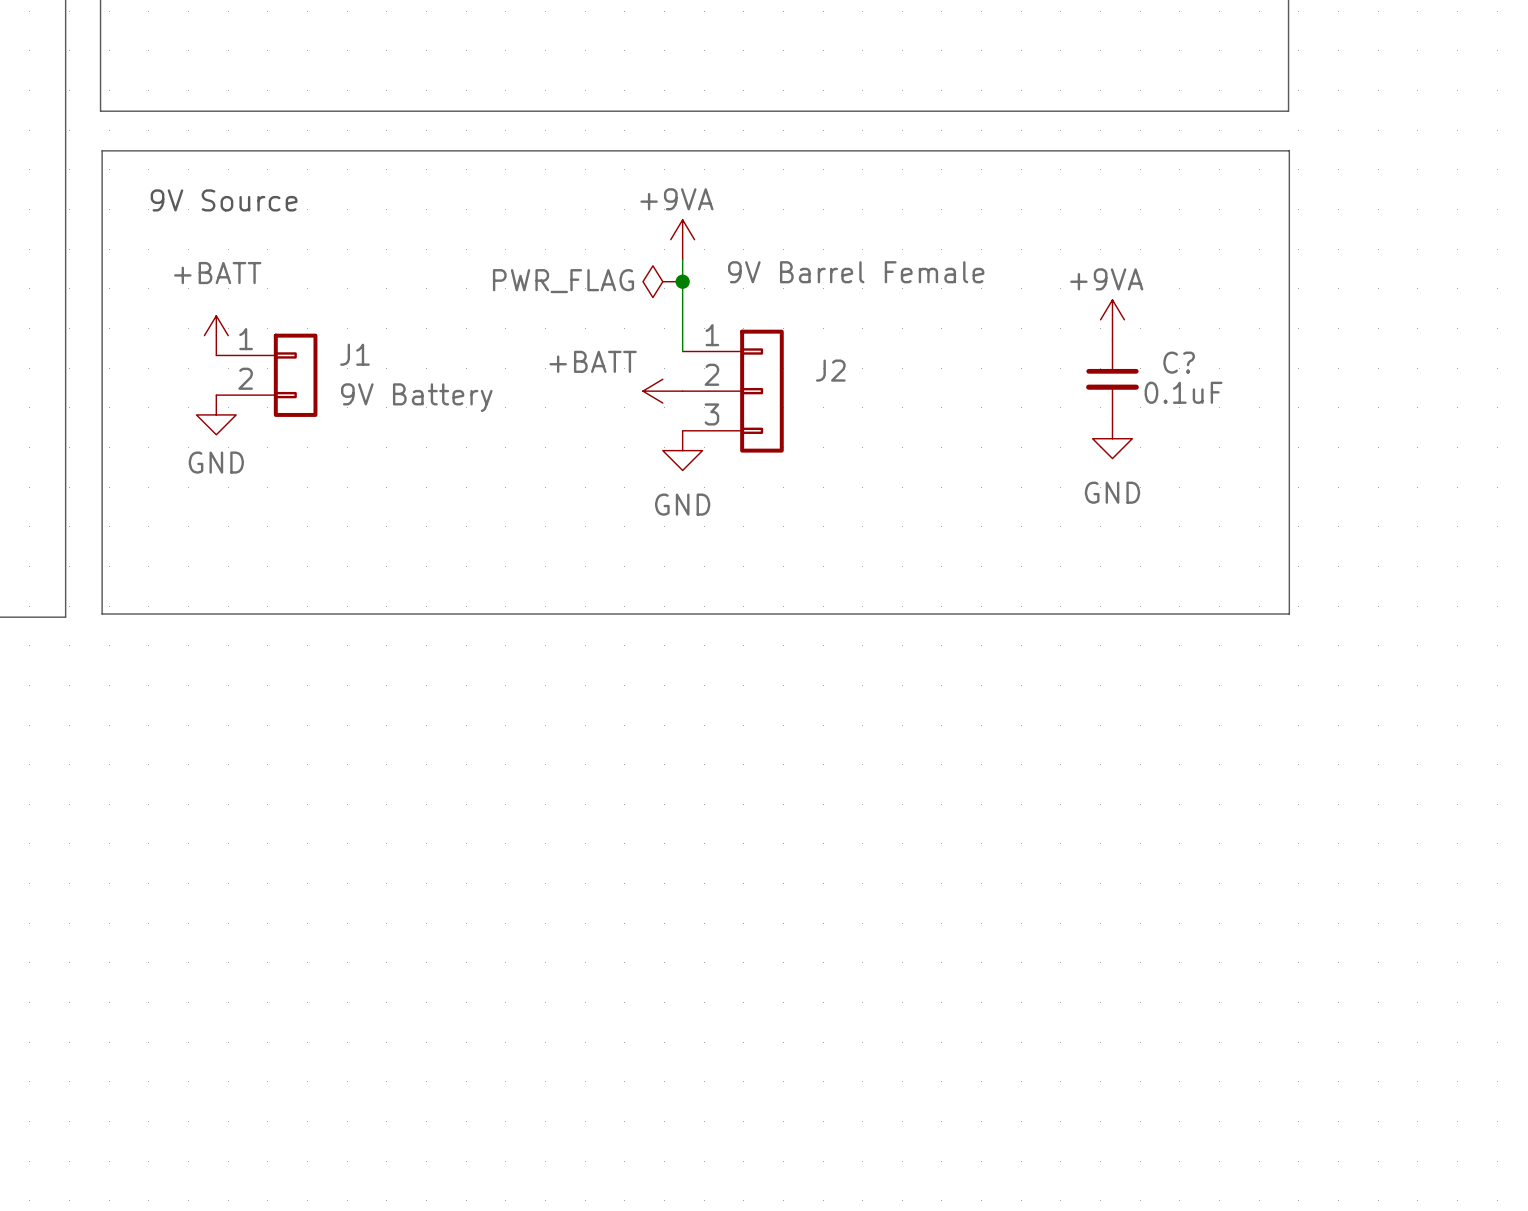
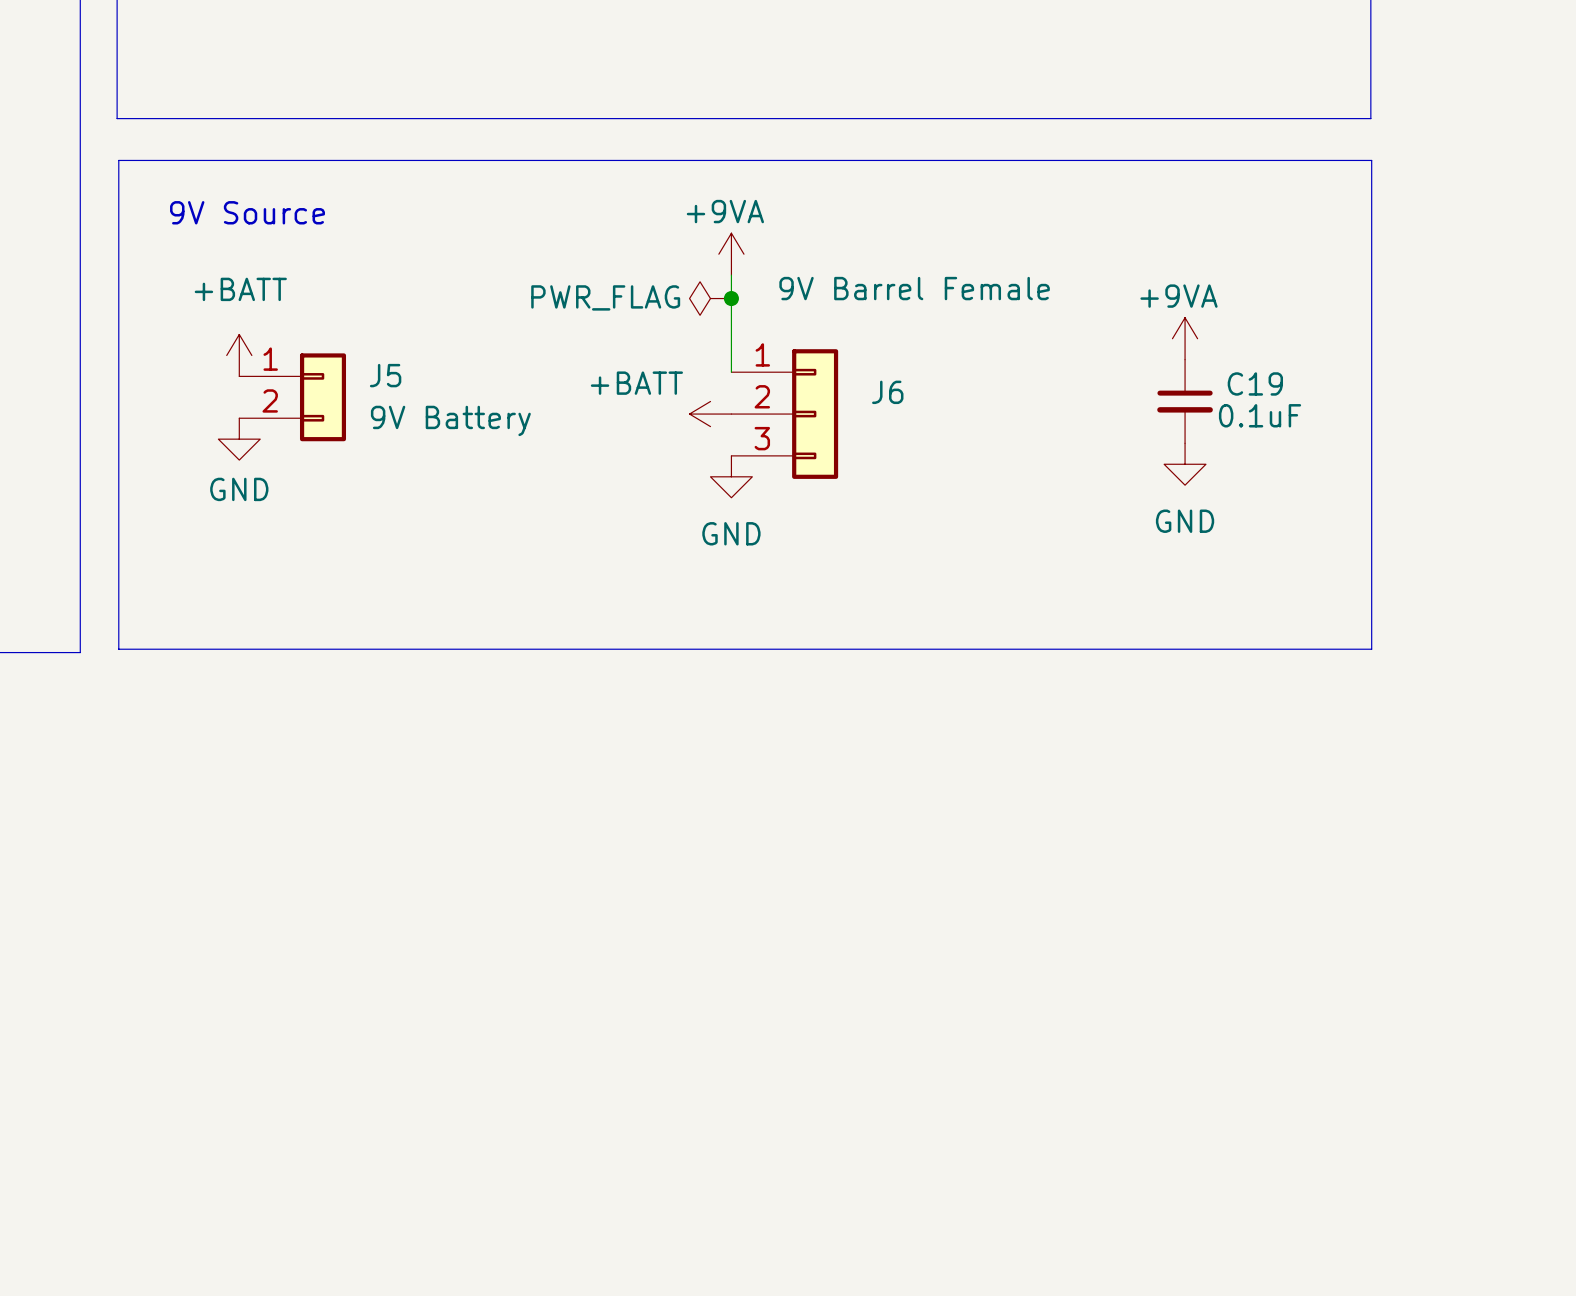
J1 name: J1 (354, 354) -> J5 (385, 375)
C? name: C? (1179, 362) -> C19 (1255, 383)
J2 name: J2 (830, 370) -> J6 (887, 392)

